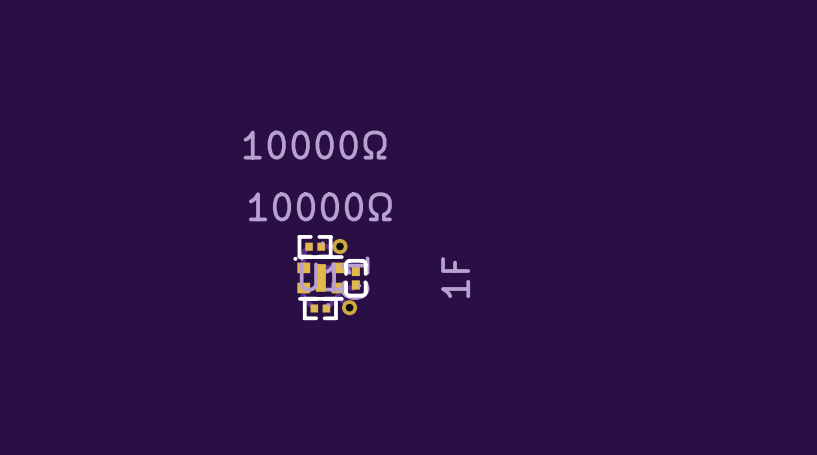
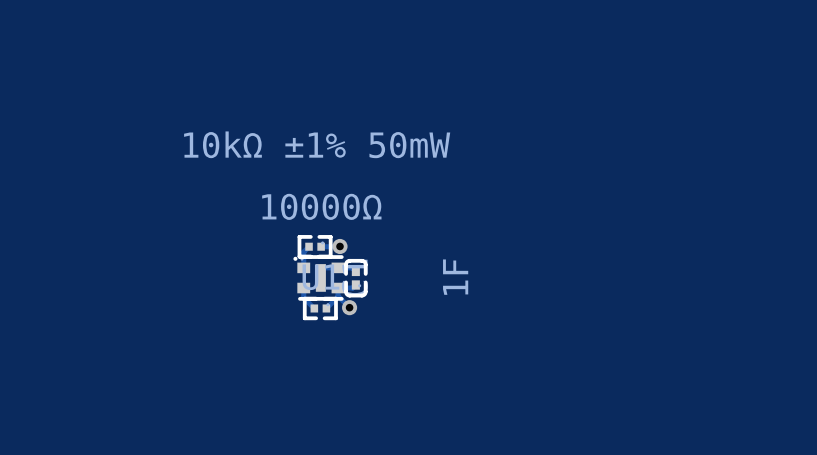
part value: 10000Ω (315, 145) -> 10kΩ ±1% 50mW (317, 144)

